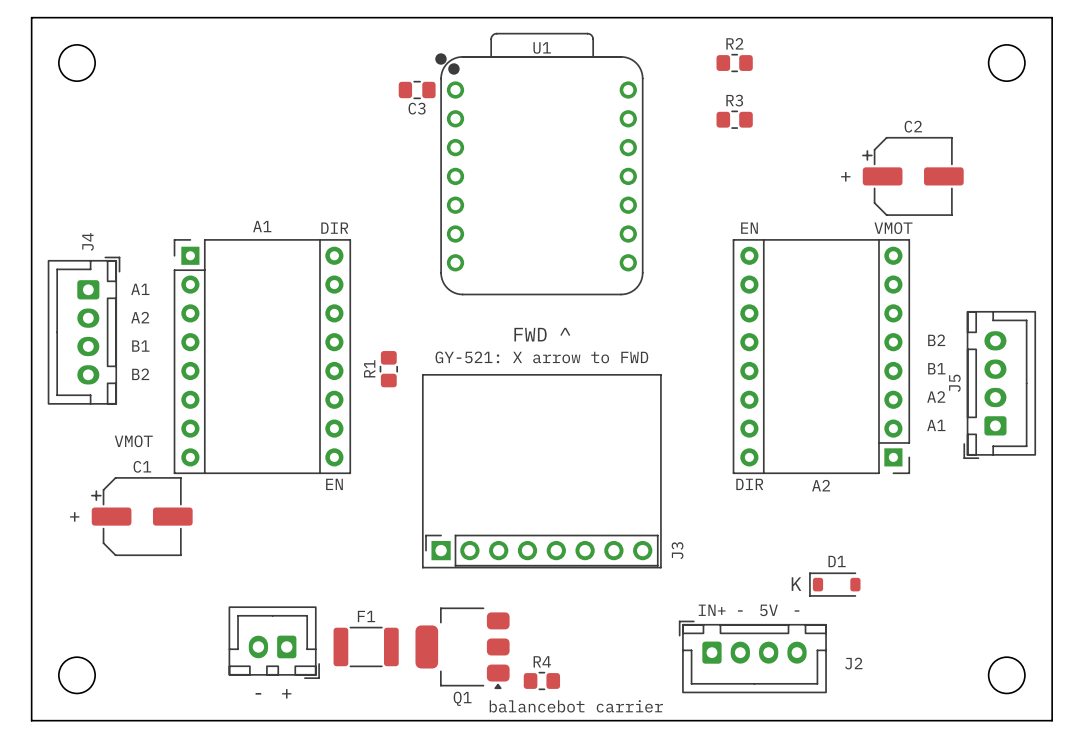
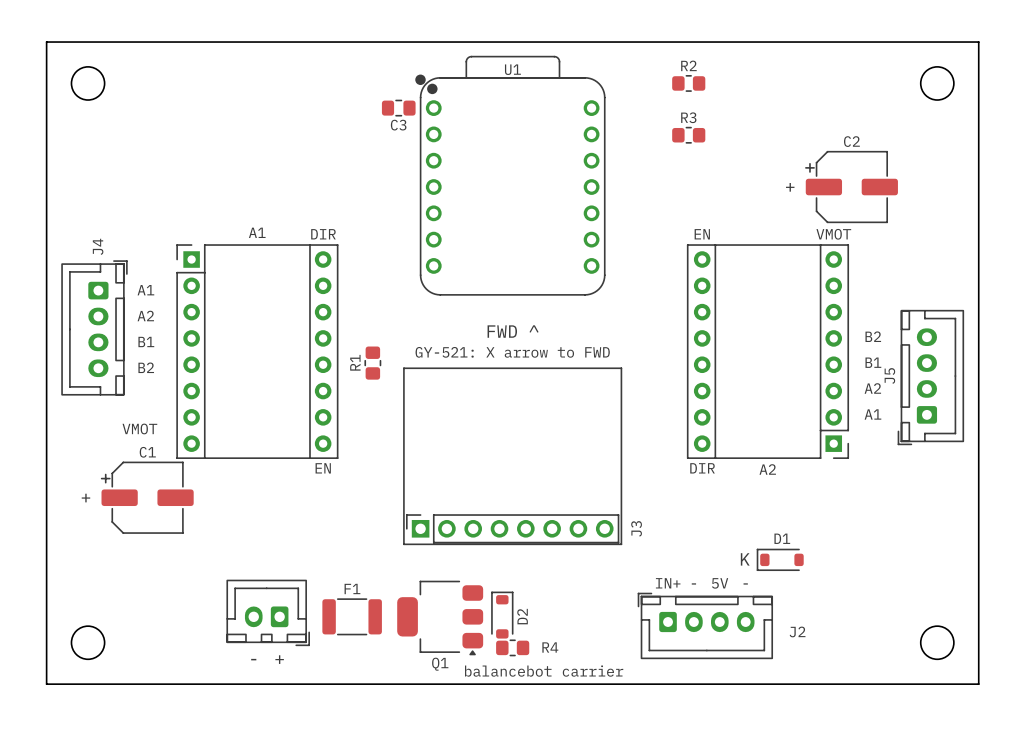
D2: none -> (502, 615)
R4 name position: R4 (542, 661) -> R4 (550, 647)

